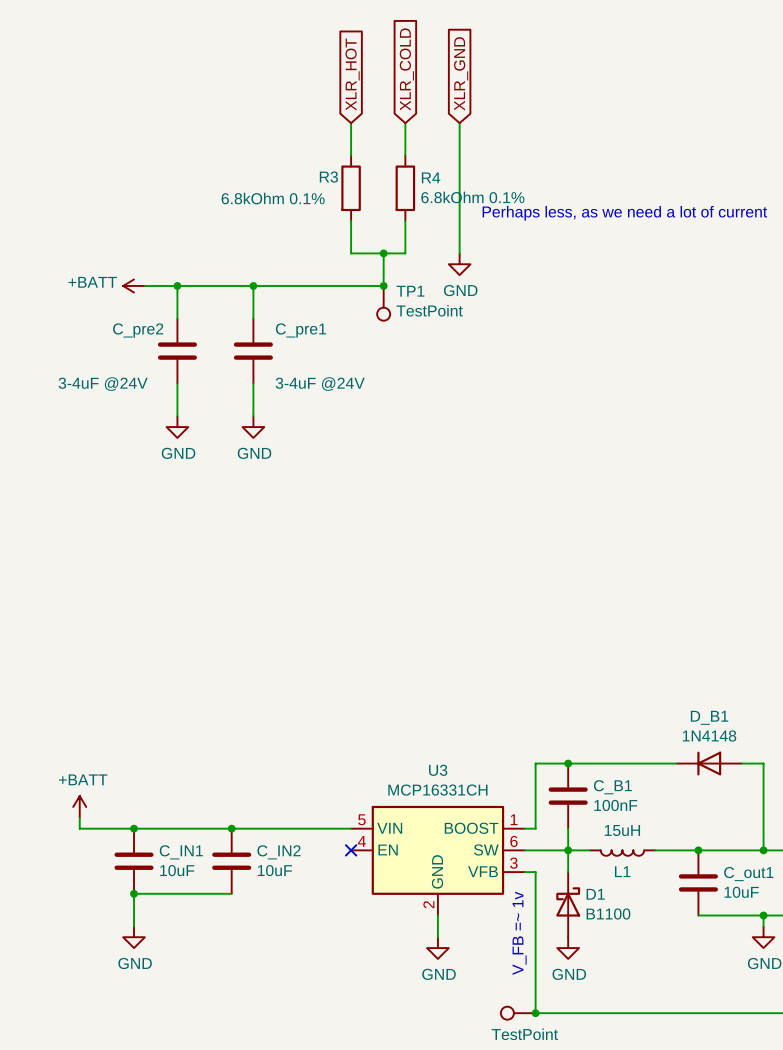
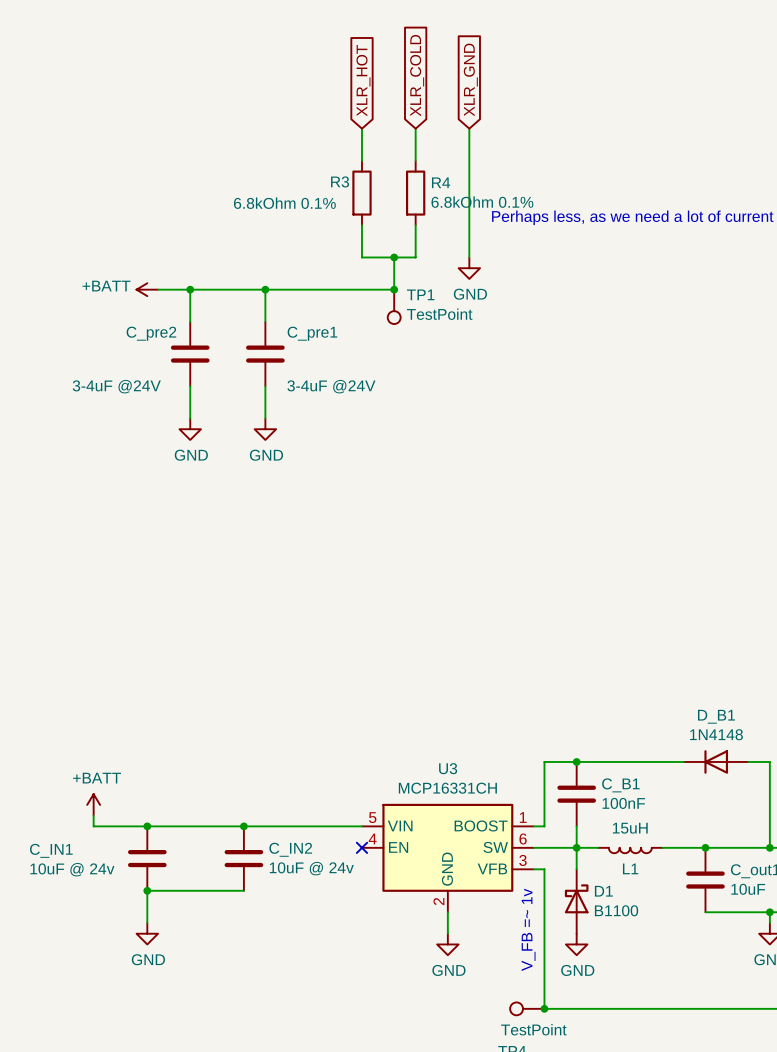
C_IN1 name position: C_IN1 (181, 852) -> C_IN1 (51, 850)
C_IN1 value: 10uF (177, 870) -> 10uF @ 24v (72, 869)
C_IN2 value: 10uF (274, 870) -> 10uF @ 24v (311, 868)

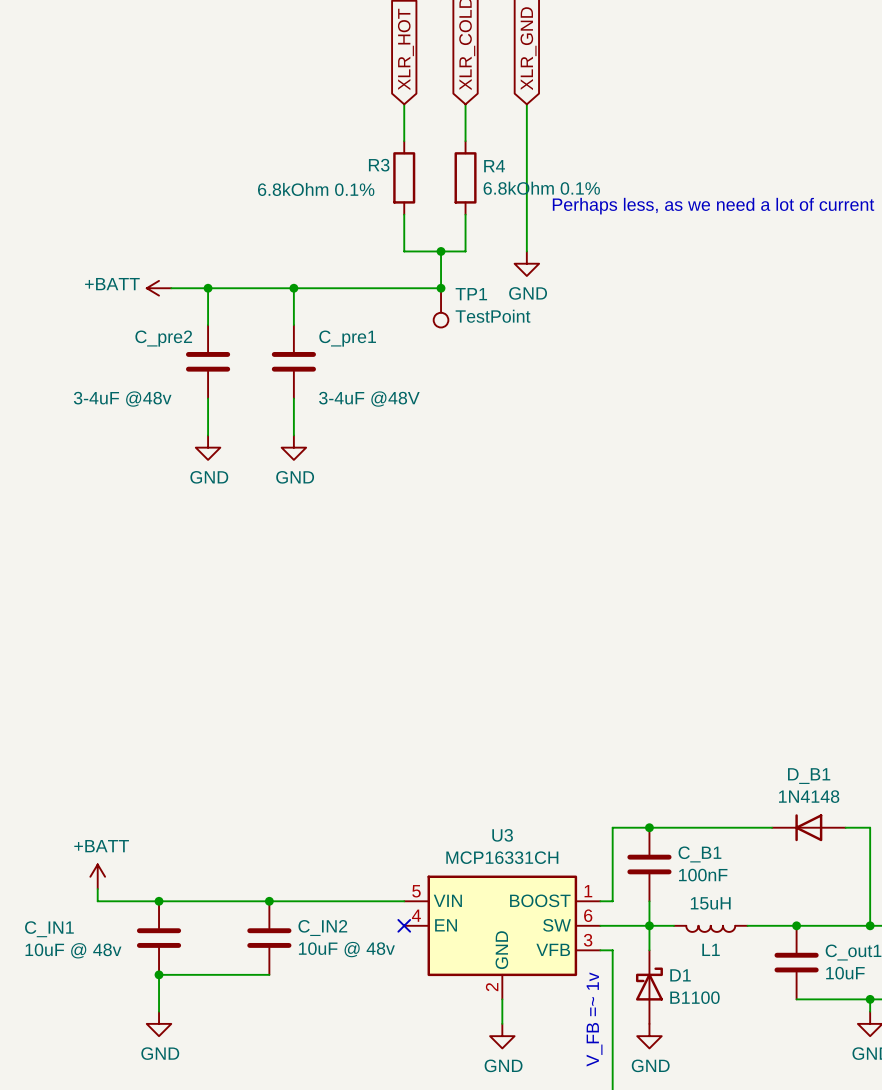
C_pre2 value: 3-4uF @24V (116, 386) -> 3-4uF @48v (122, 399)
C_pre1 value: 3-4uF @24V (331, 386) -> 3-4uF @48V (369, 399)
C_IN2 value: 10uF @ 24v (311, 868) -> 10uF @ 48v (346, 949)
C_IN1 value: 10uF @ 24v (72, 869) -> 10uF @ 48v (73, 950)

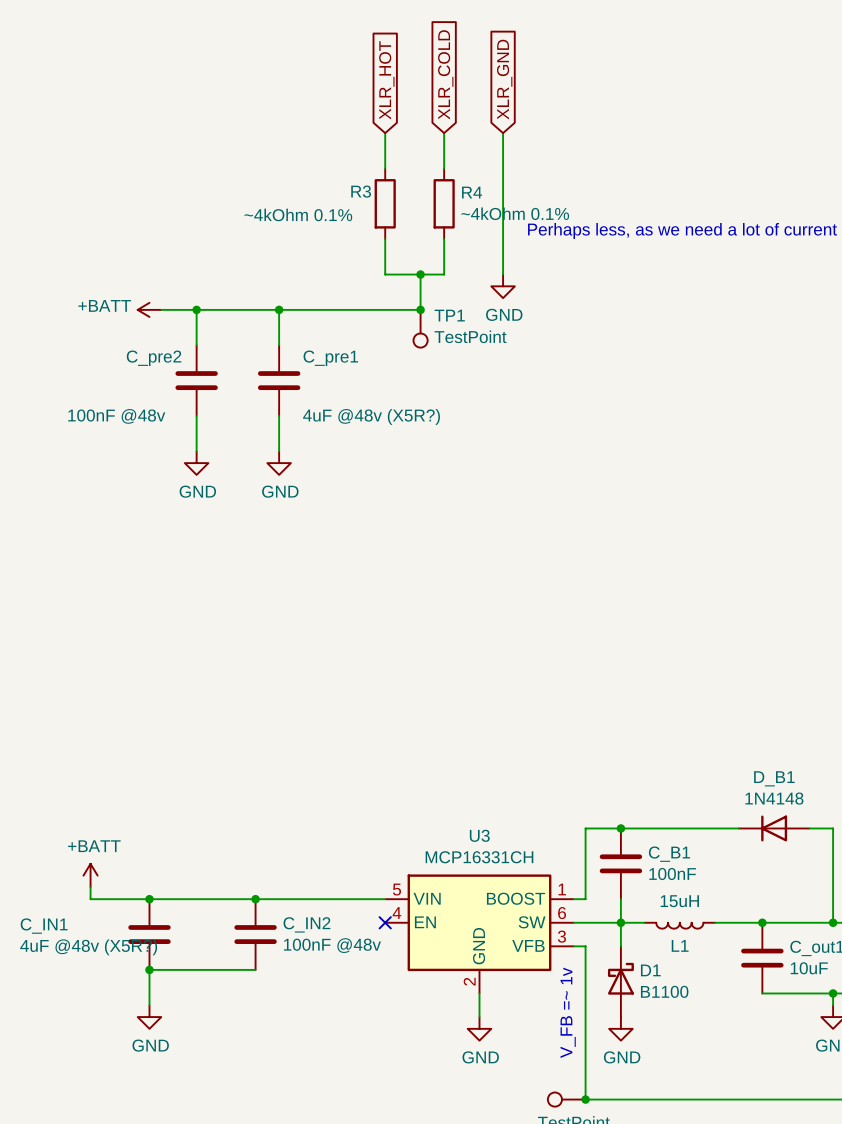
R4 value: 6.8kOhm 0.1% (541, 188) -> ~4kOhm 0.1% (515, 213)
R3 value: 6.8kOhm 0.1% (316, 189) -> ~4kOhm 0.1% (298, 214)
C_pre2 value: 3-4uF @48v (122, 399) -> 100nF @48v (116, 416)
C_pre1 value: 3-4uF @48V (369, 399) -> 4uF @48v (X5R?) (371, 416)
C_IN2 value: 10uF @ 48v (346, 949) -> 100nF @48v (332, 945)
C_IN1 value: 10uF @ 48v (73, 950) -> 4uF @48v (X5R?) (88, 947)

